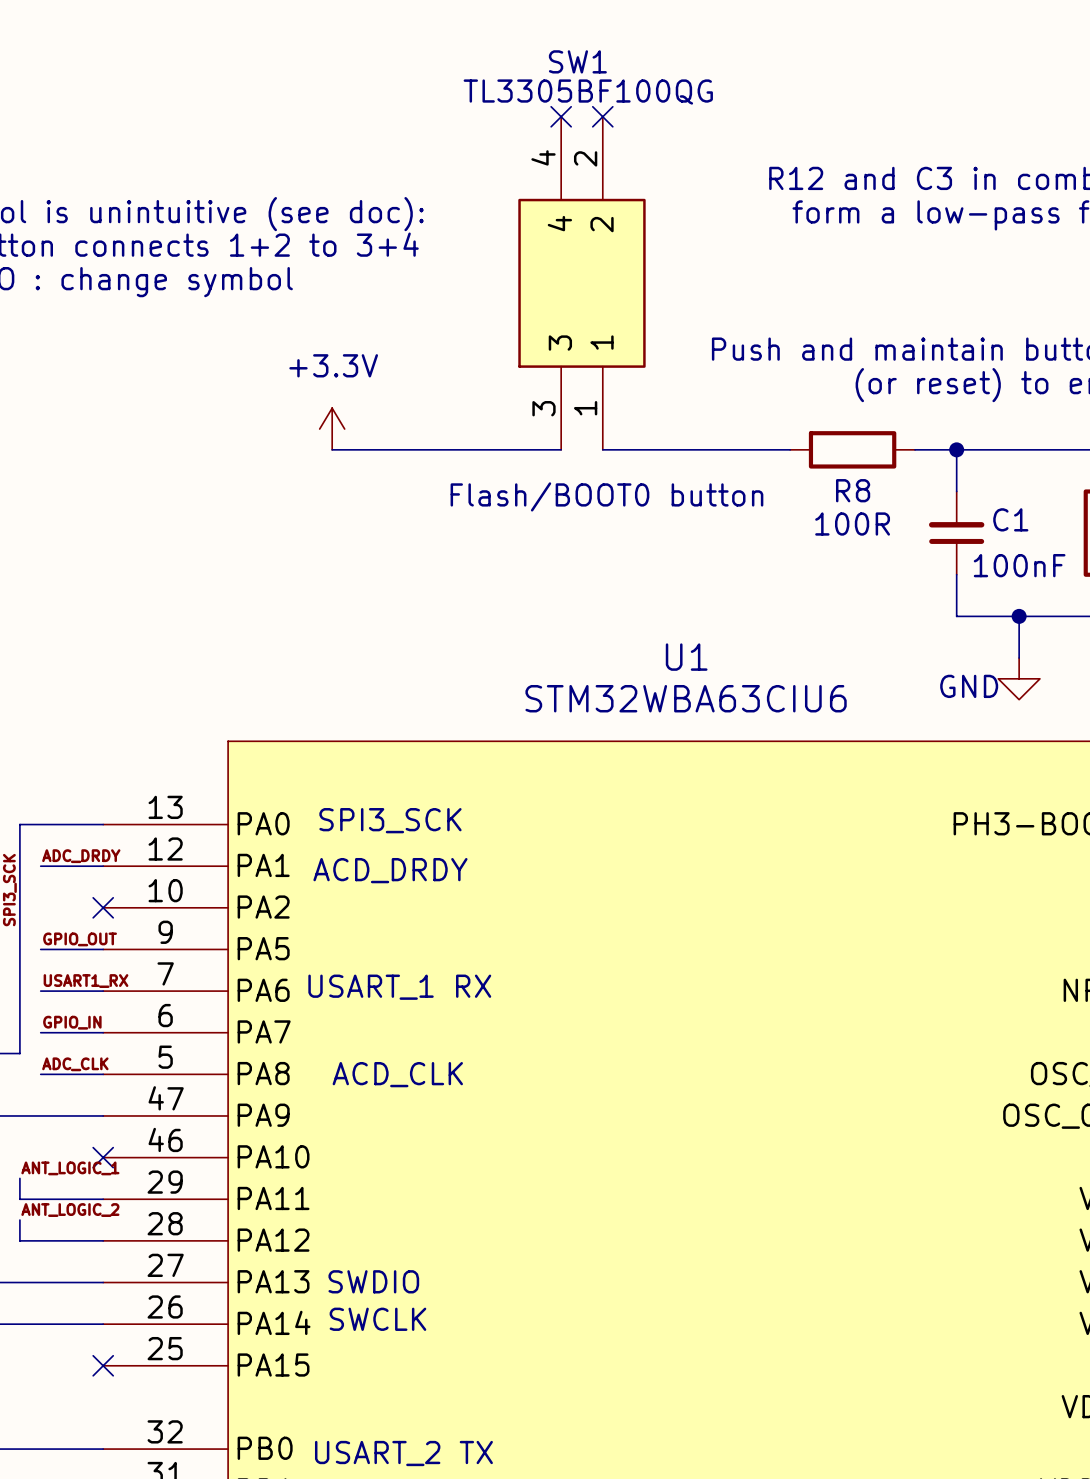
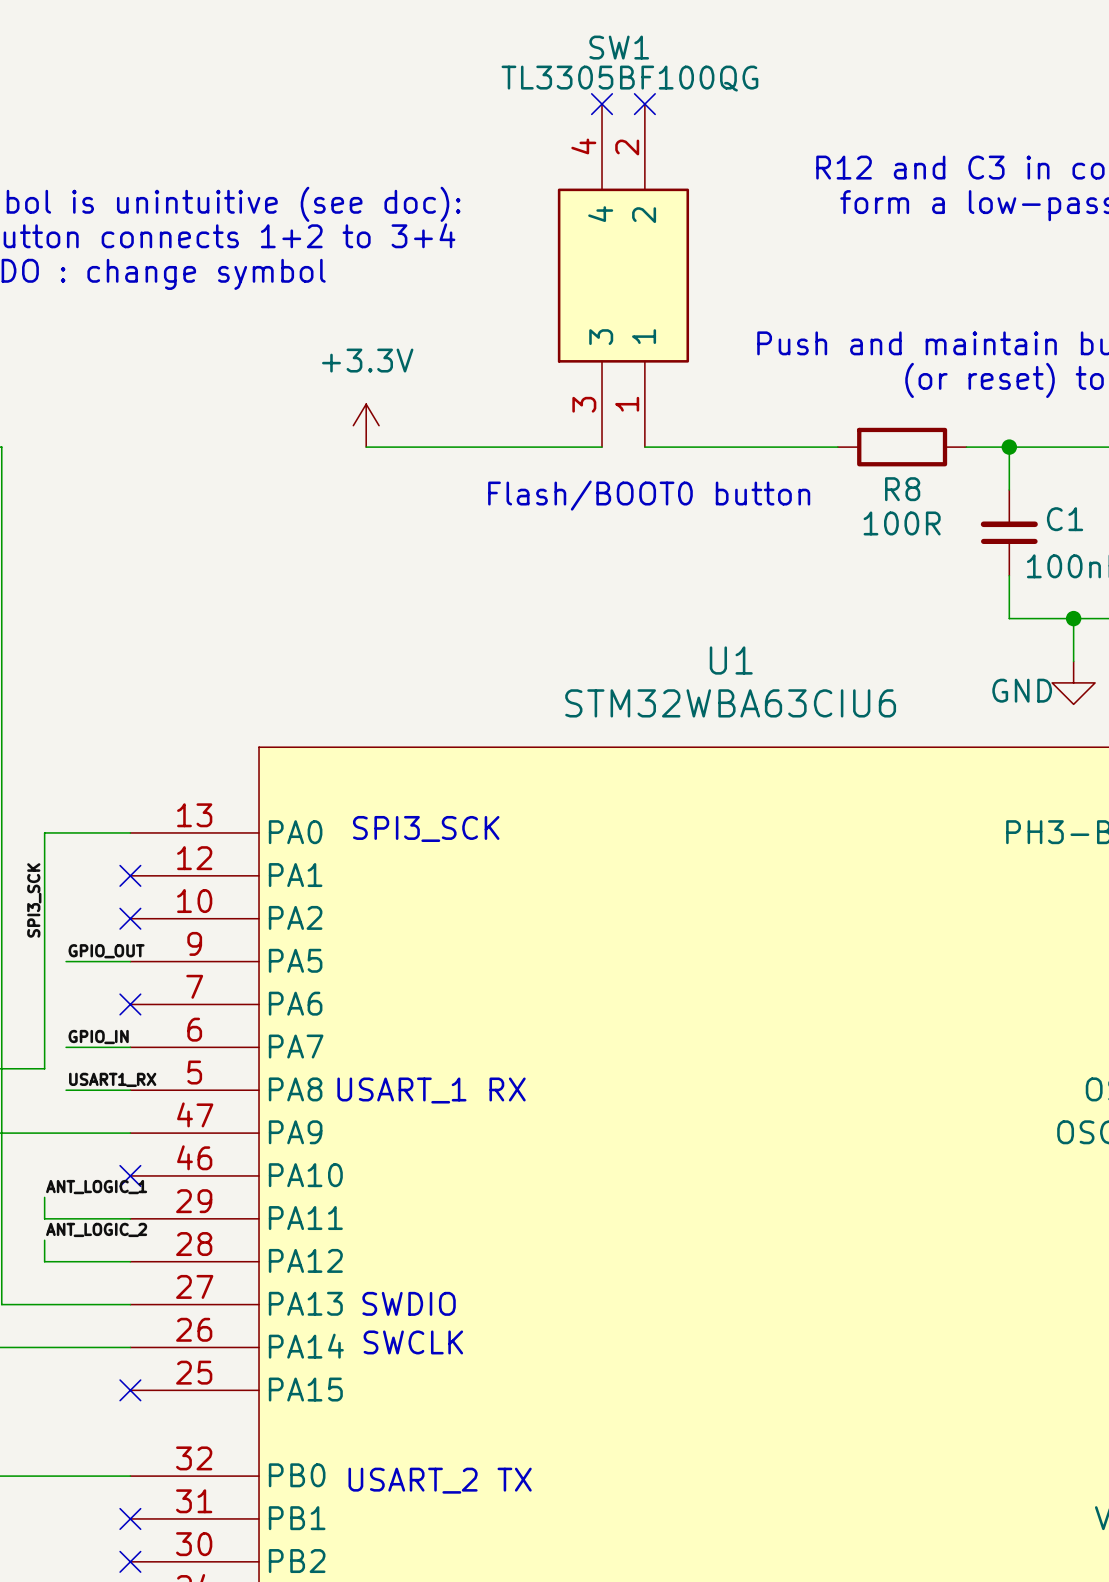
label: ADC_DRDY (81, 856) -> none
wire: (40, 866) (103, 866) -> none
no-connect mark: none -> (130, 875)
text: ACD_DRDY (390, 870) -> none
label: USART1_RX (86, 981) -> none
text position: USART_1 RX (399, 987) -> USART_1 RX (431, 1090)
wire: (40, 991) (103, 991) -> none
no-connect mark: none -> (130, 1004)
label: ADC_CLK (75, 1064) -> USART1_RX (112, 1079)
text: ACD_CLK (397, 1074) -> none

